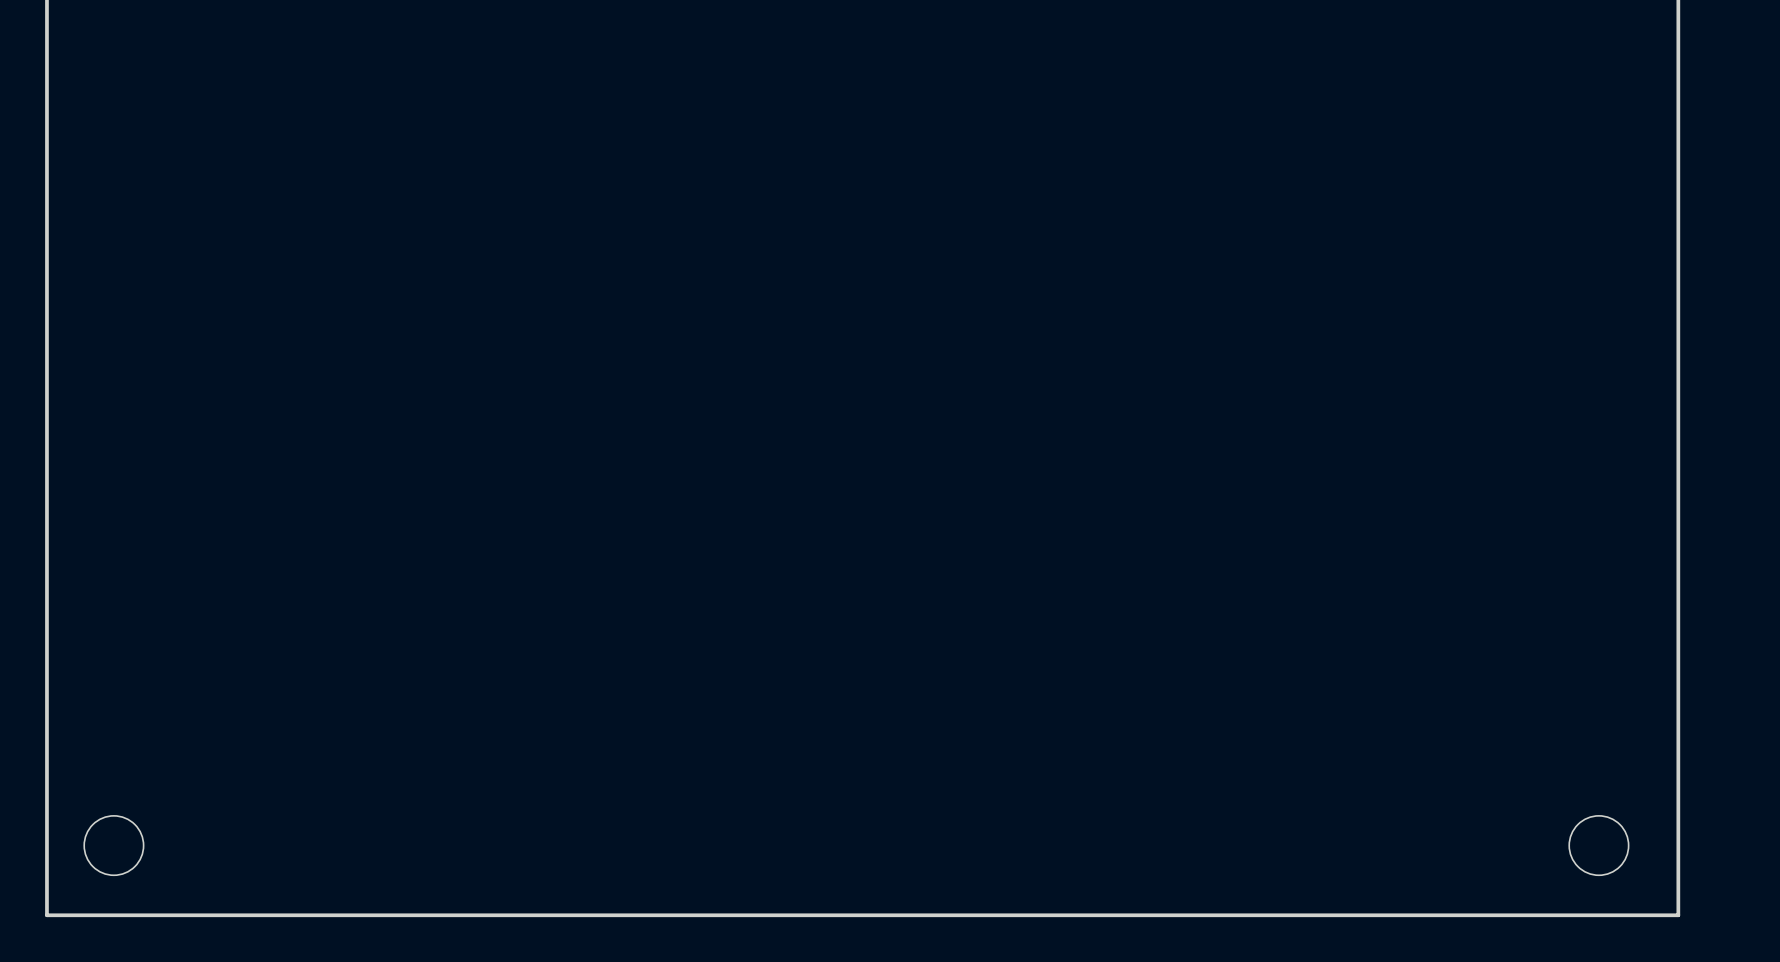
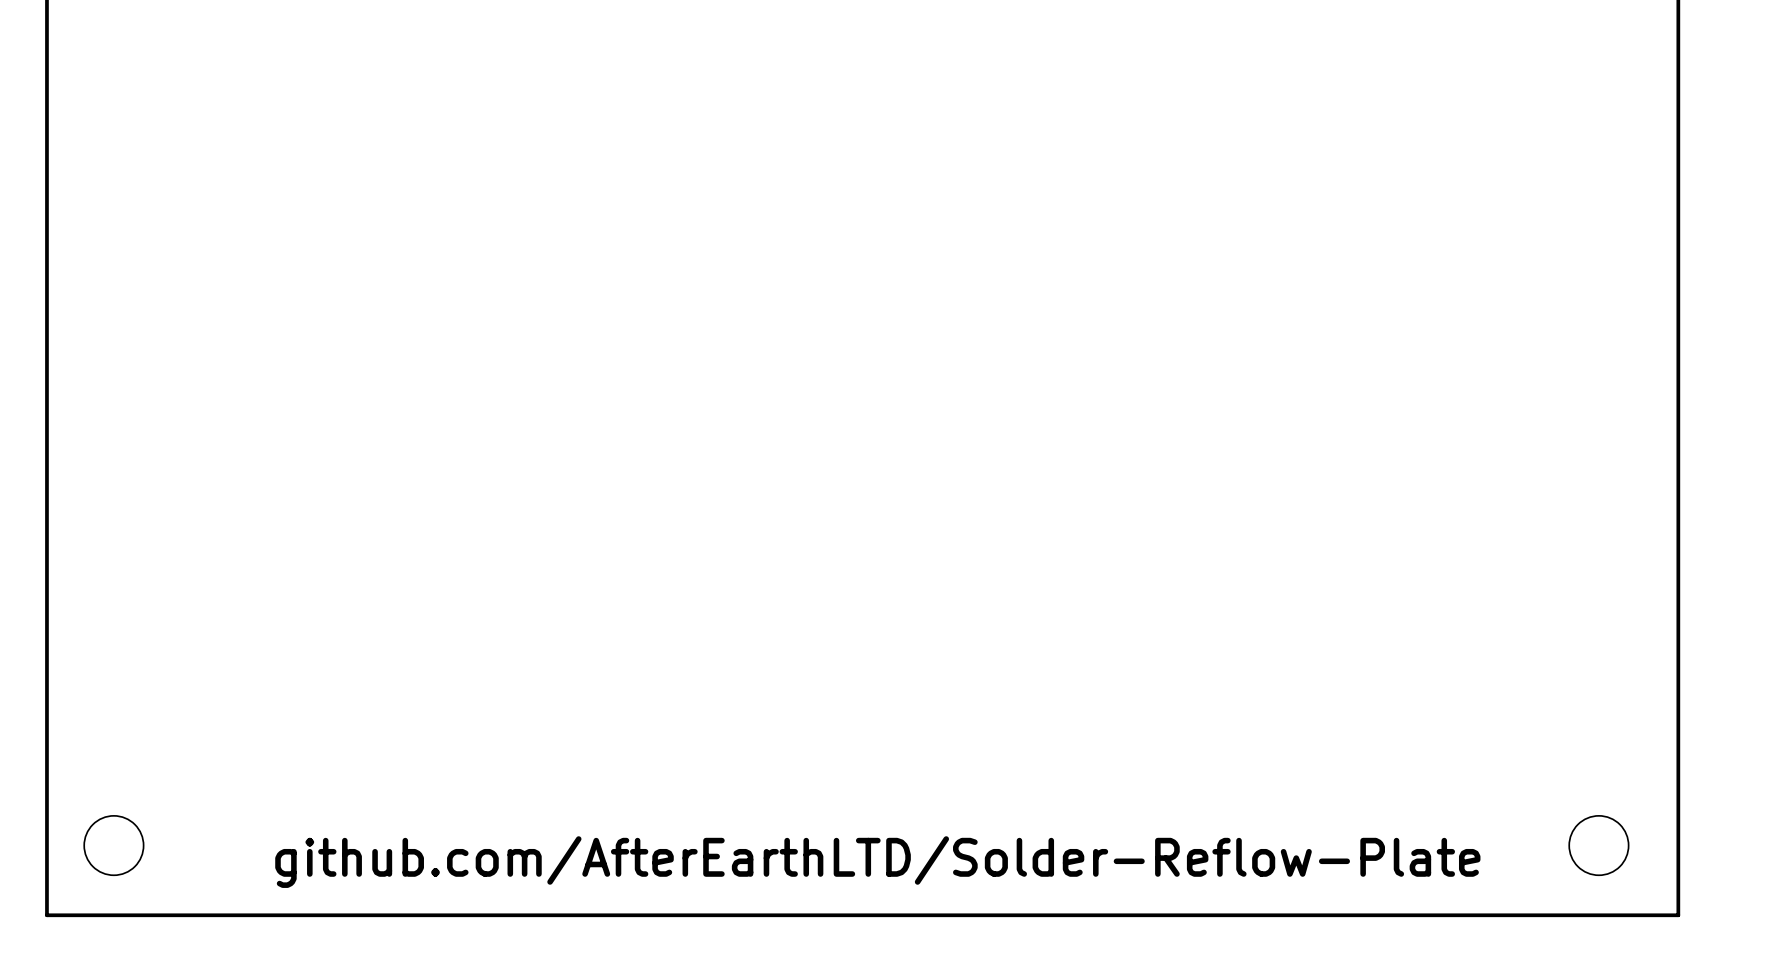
text: none -> github.com/AfterEarthLTD/Solder-Reflow-Plate (877, 862)

